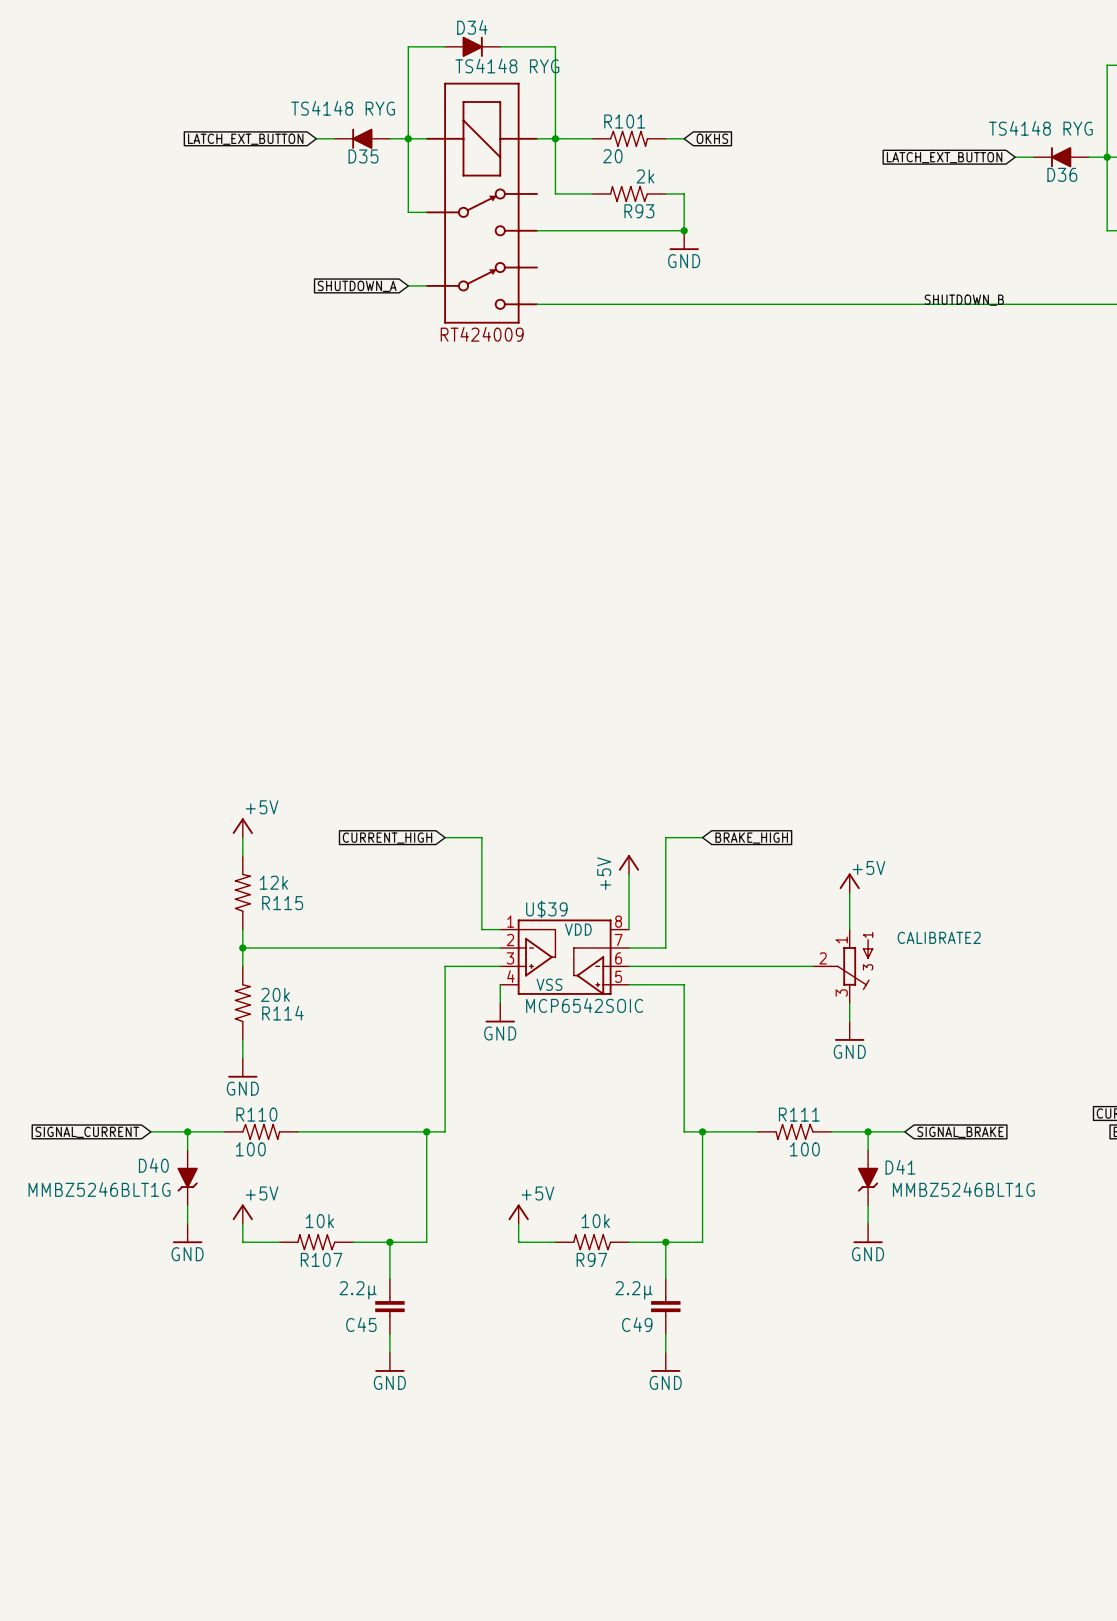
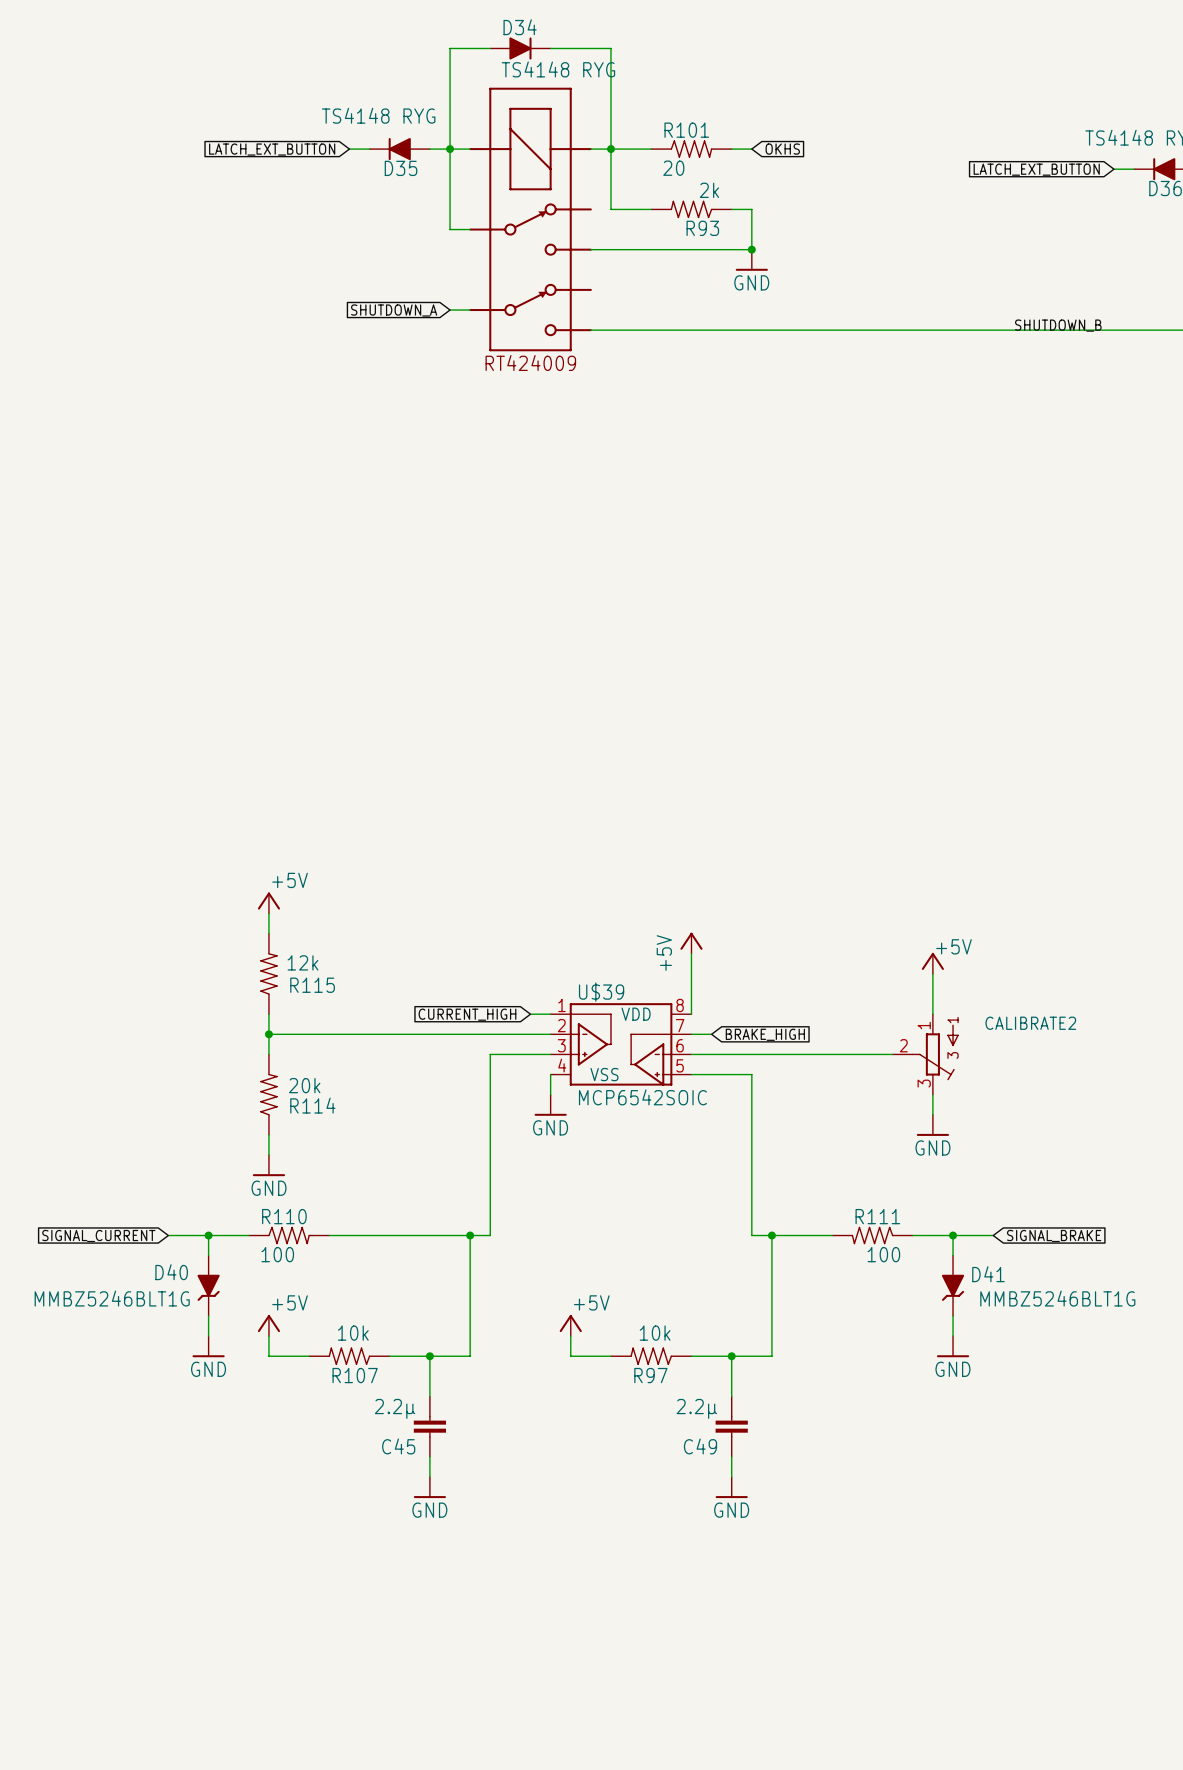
wire: (445, 837) (481, 837) (481, 929) -> none
wire: (702, 837) (665, 837) (665, 947) (647, 947) -> none
global label position: CURRENT_HIGH (387, 838) -> CURRENT_HIGH (467, 1014)
global label position: BRAKE_HIGH (751, 838) -> BRAKE_HIGH (765, 1034)

